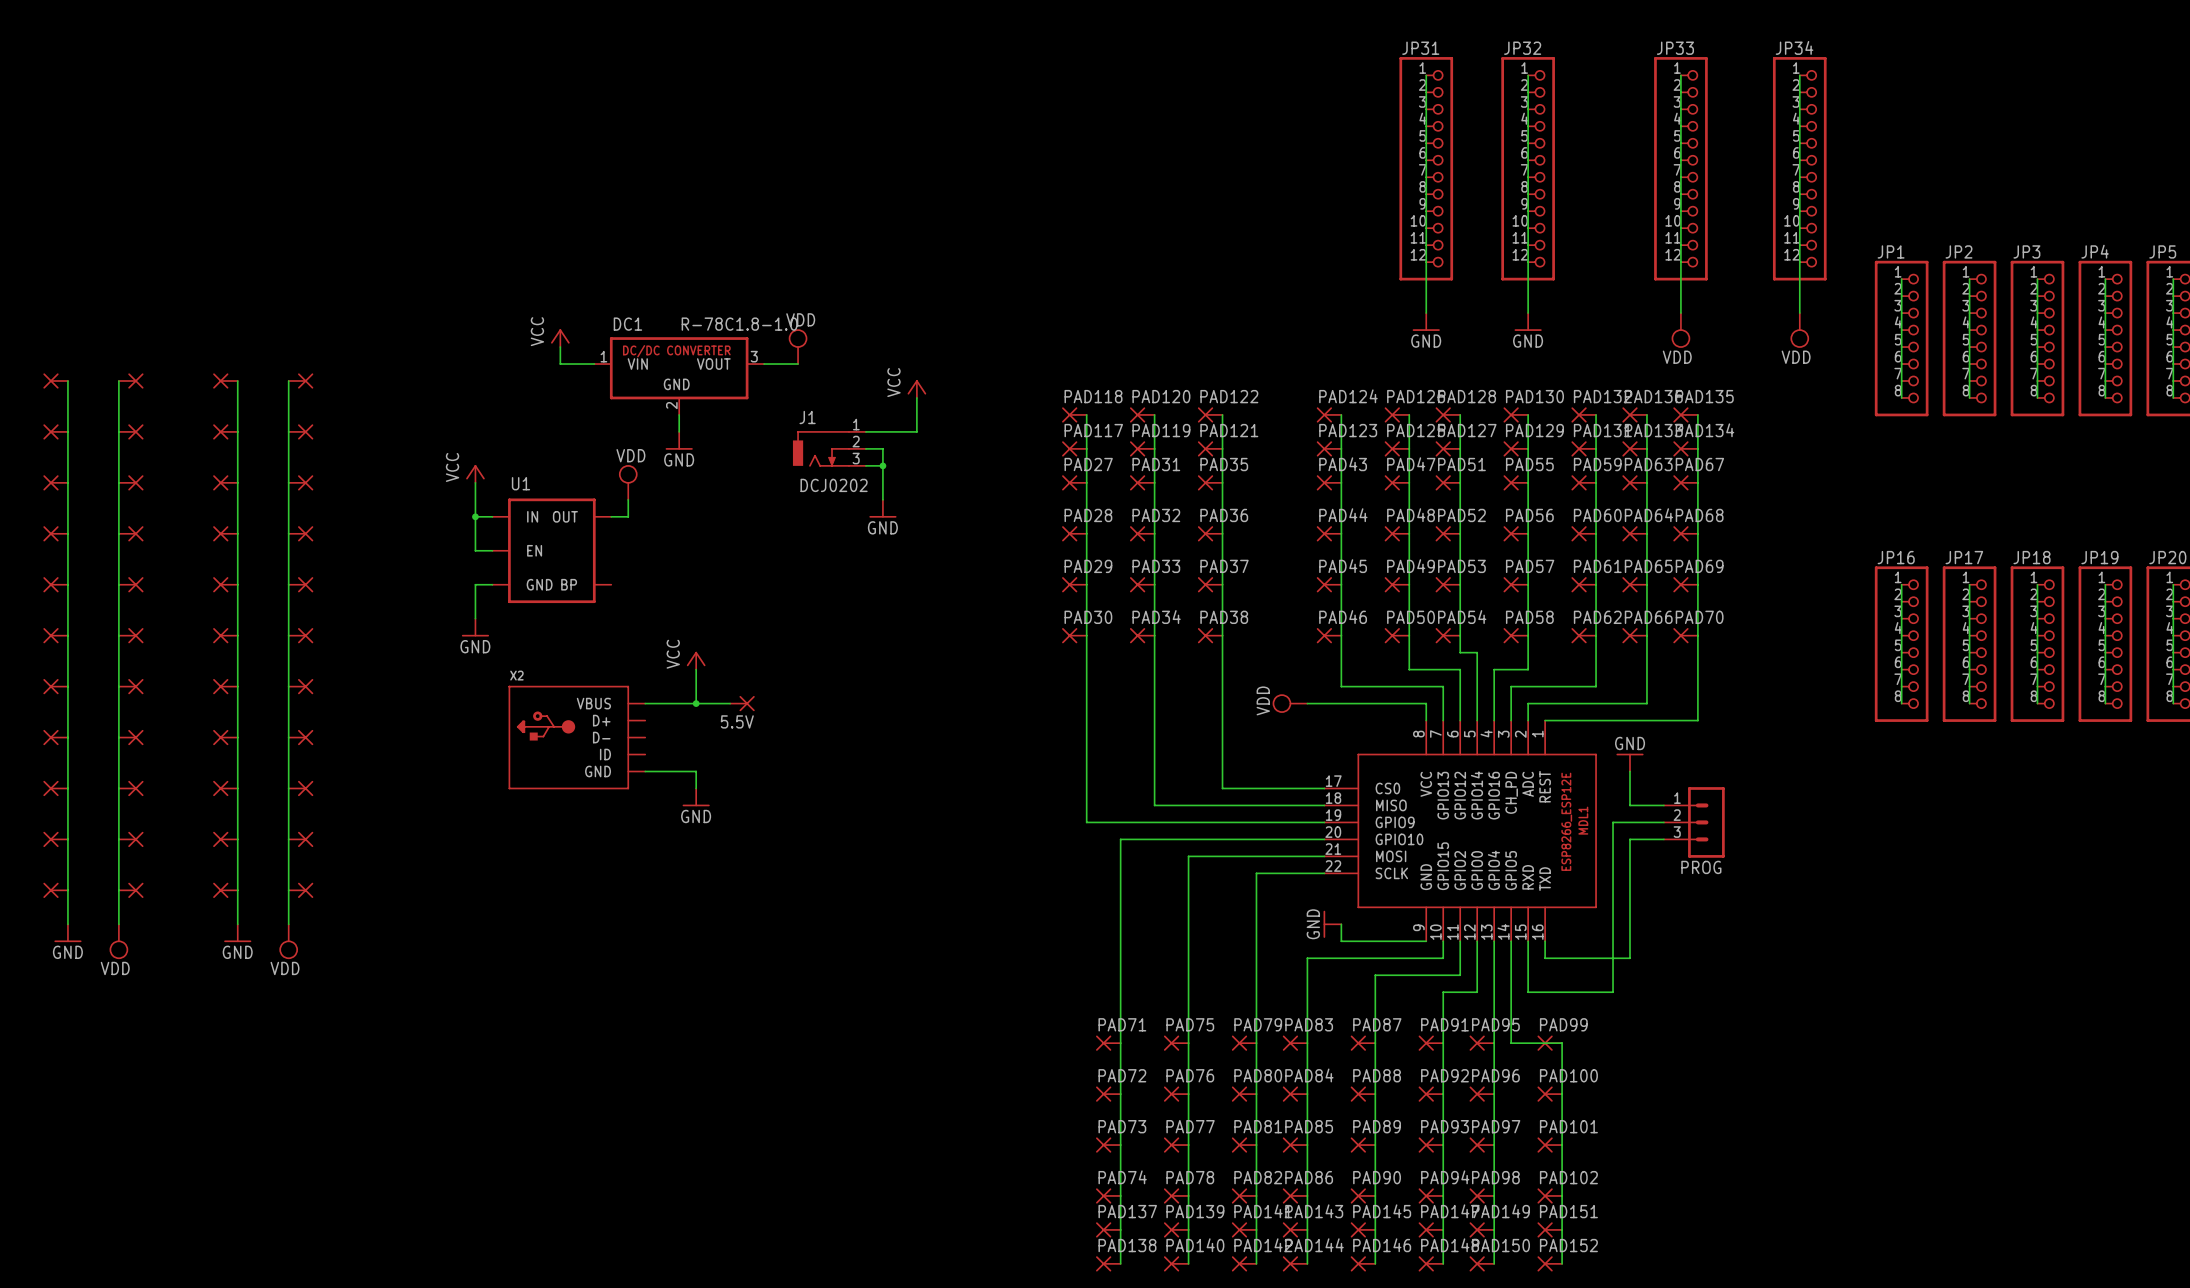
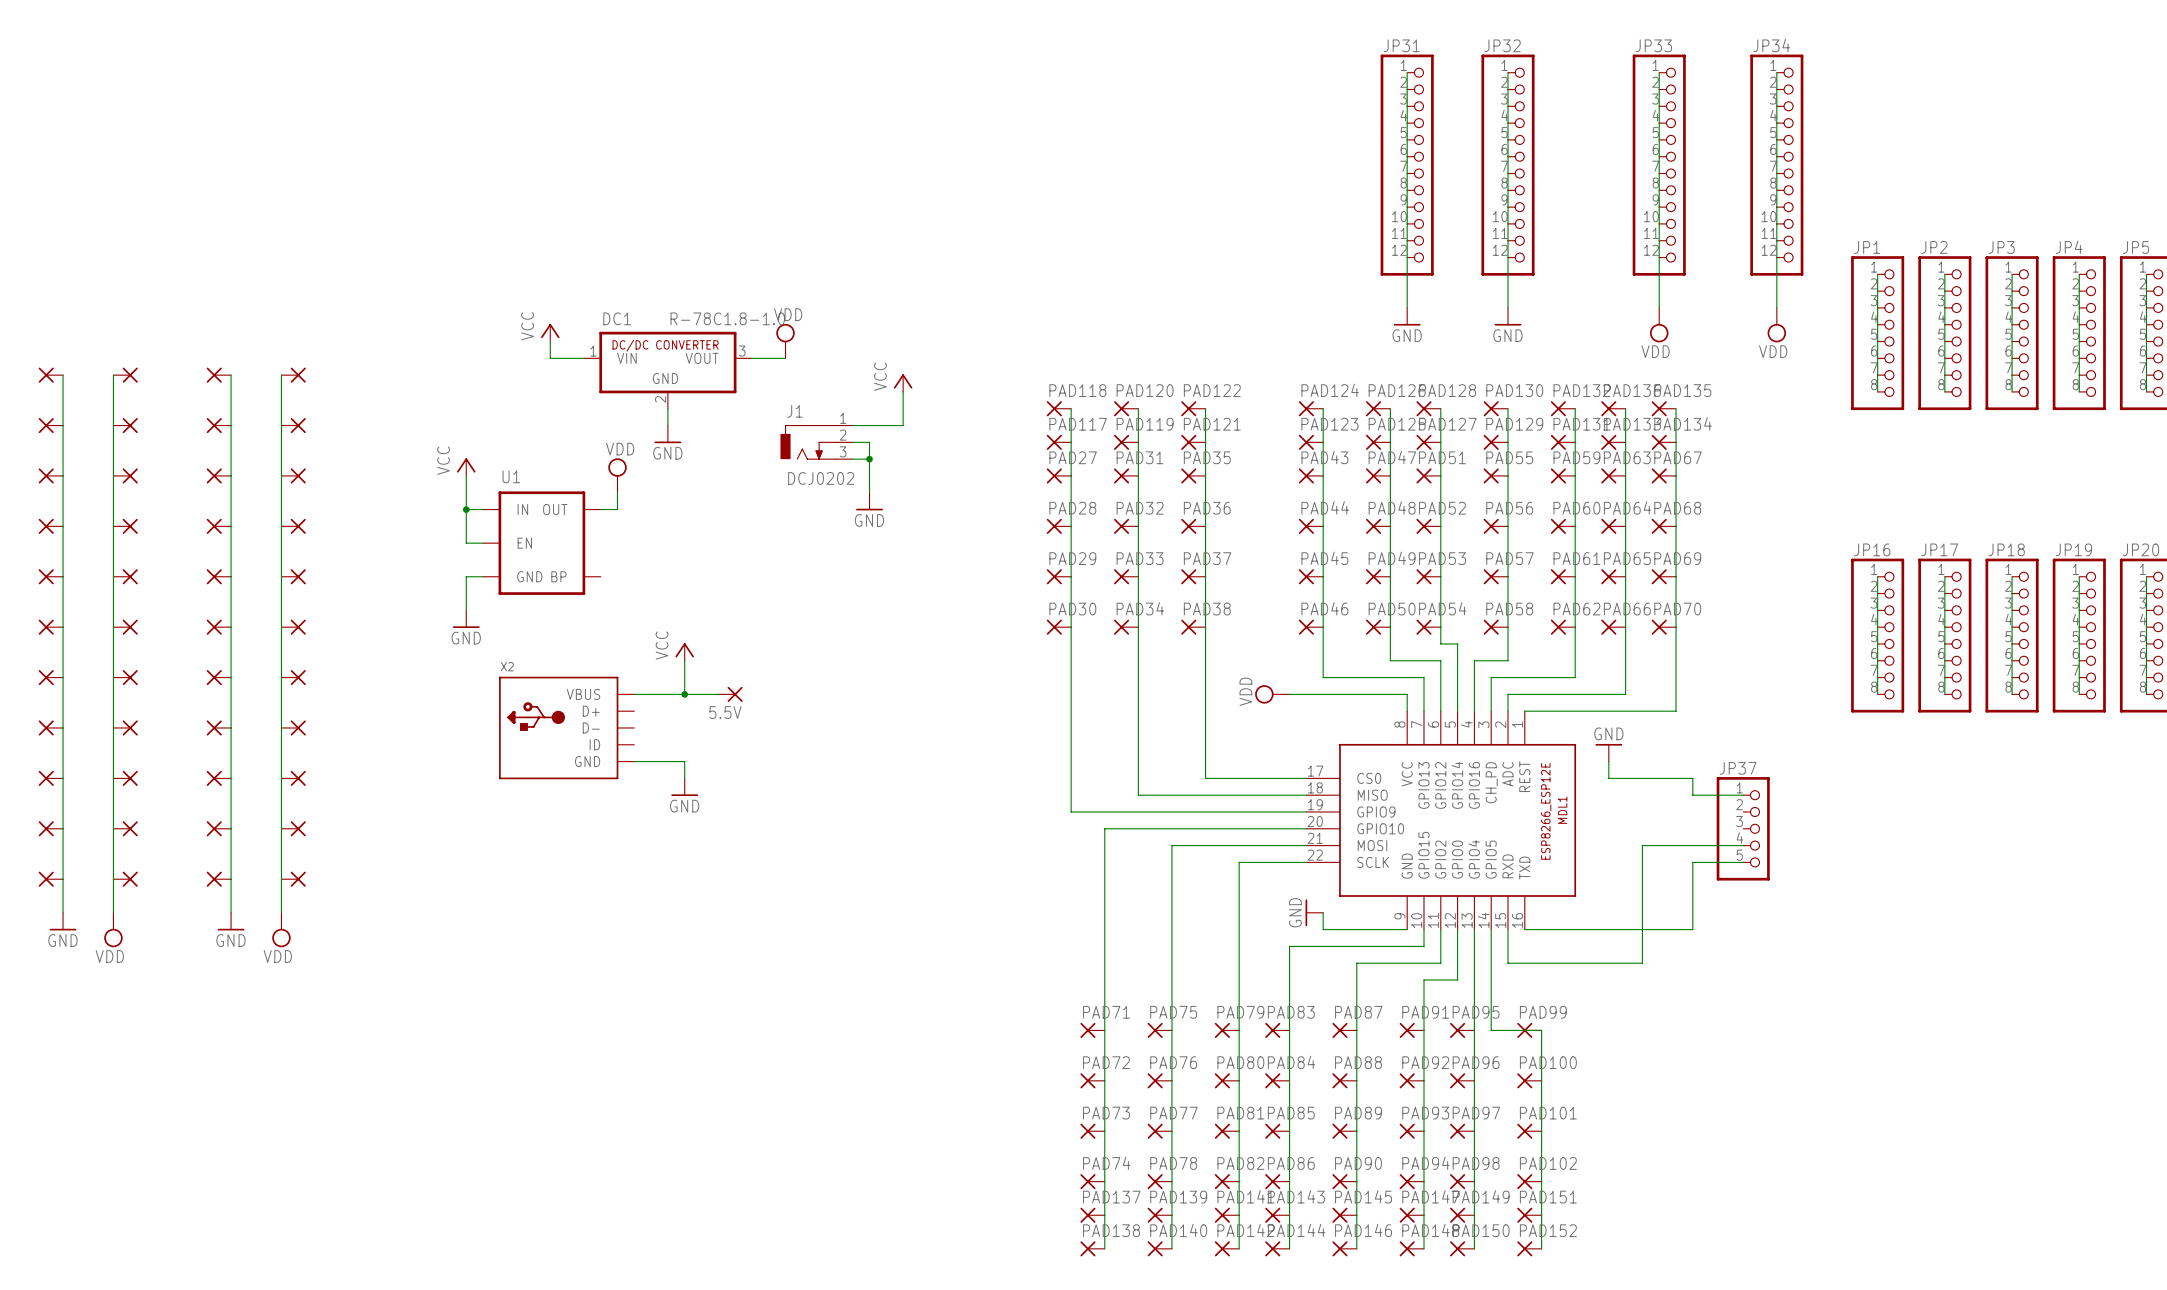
wire: (1630, 788) (1630, 805) (1663, 805) -> (1608, 778) (1692, 778) (1692, 795) (1743, 795)
wire: (1663, 822) (1613, 822) (1613, 992) (1528, 992) (1528, 975) -> (1743, 845) (1642, 845) (1642, 963) (1508, 963)
PROG: (1694, 822) -> none
wire: (1663, 839) (1630, 839) (1630, 958) (1545, 958) (1545, 941) -> (1743, 862) (1692, 862) (1692, 929) (1524, 929)
JP37: none -> (1743, 828)

